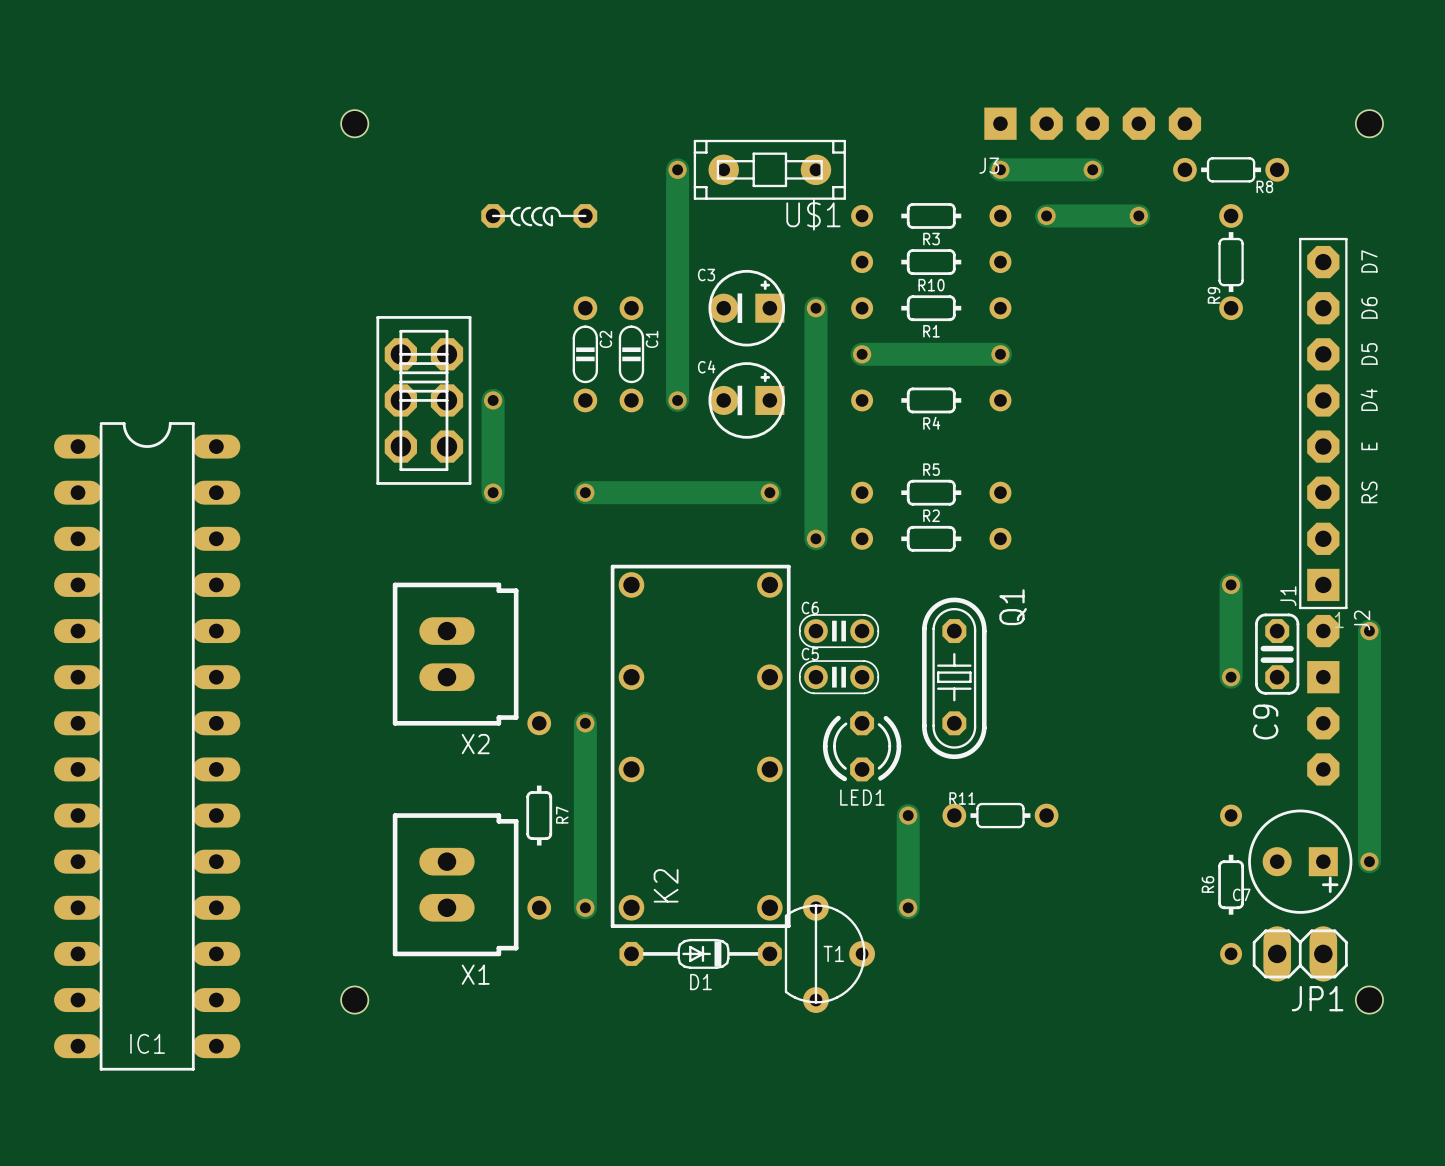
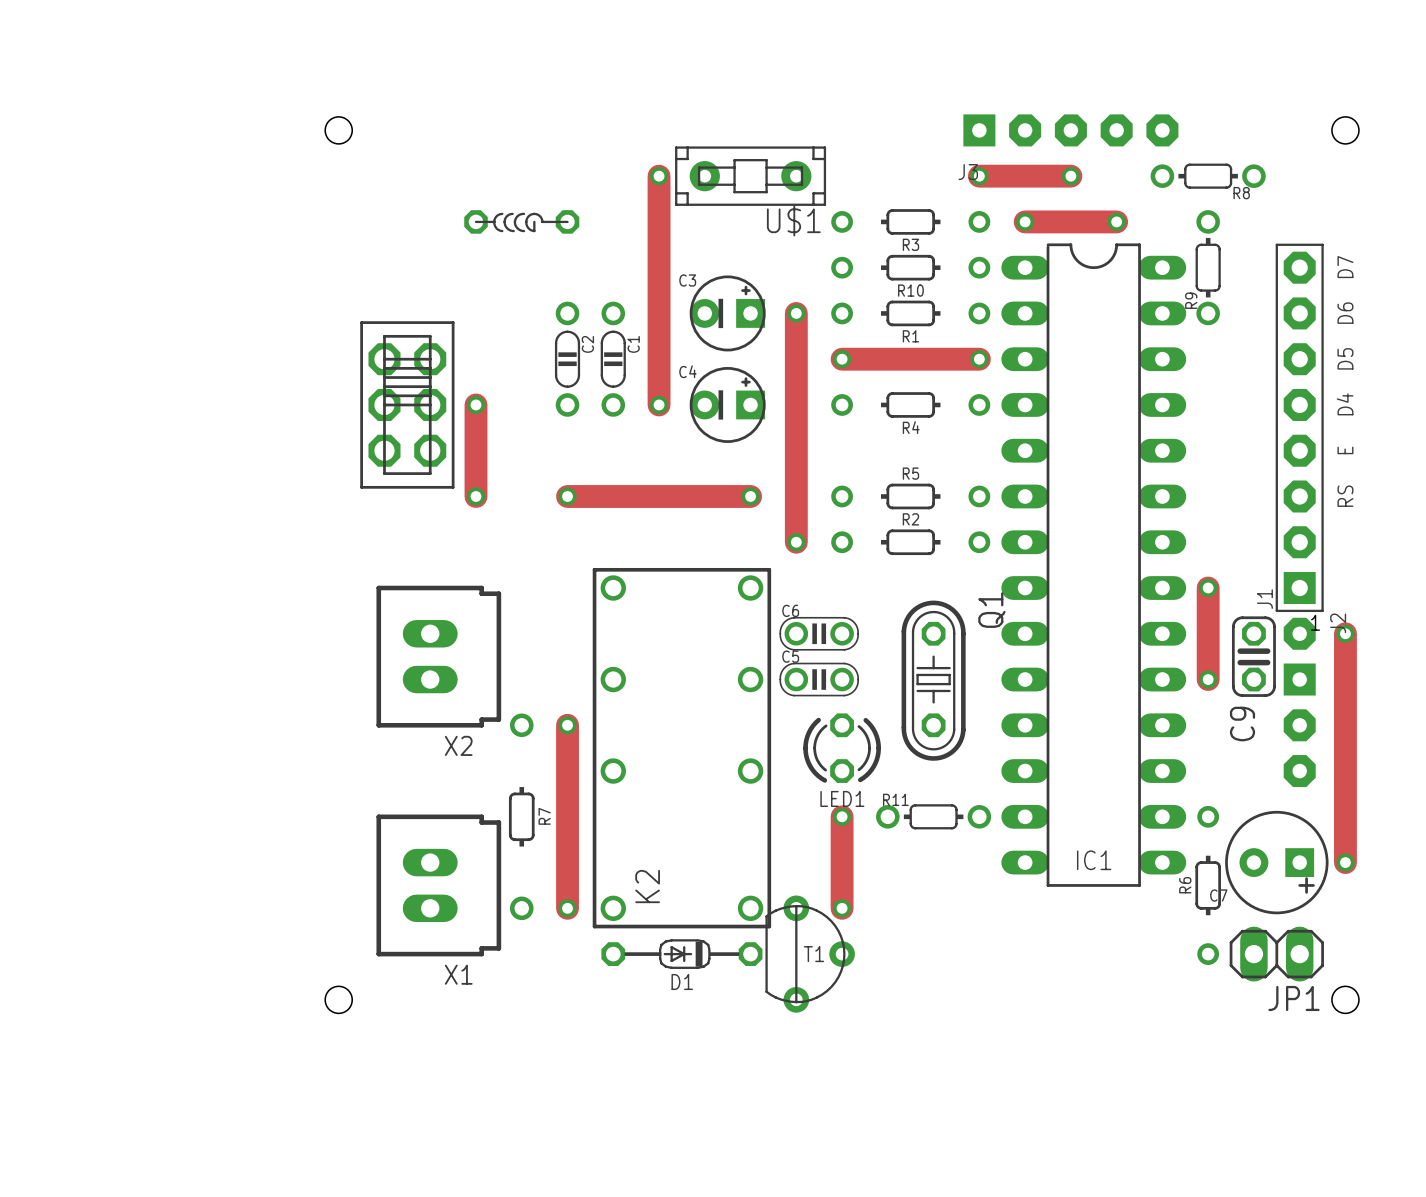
IC1 position: (147, 746) -> (1093, 565)
track: (908, 815) (908, 907) -> (842, 816) (842, 908)
via position: (908, 815) -> (842, 816)
R11 position: (1000, 815) -> (933, 816)
via position: (908, 907) -> (842, 908)

